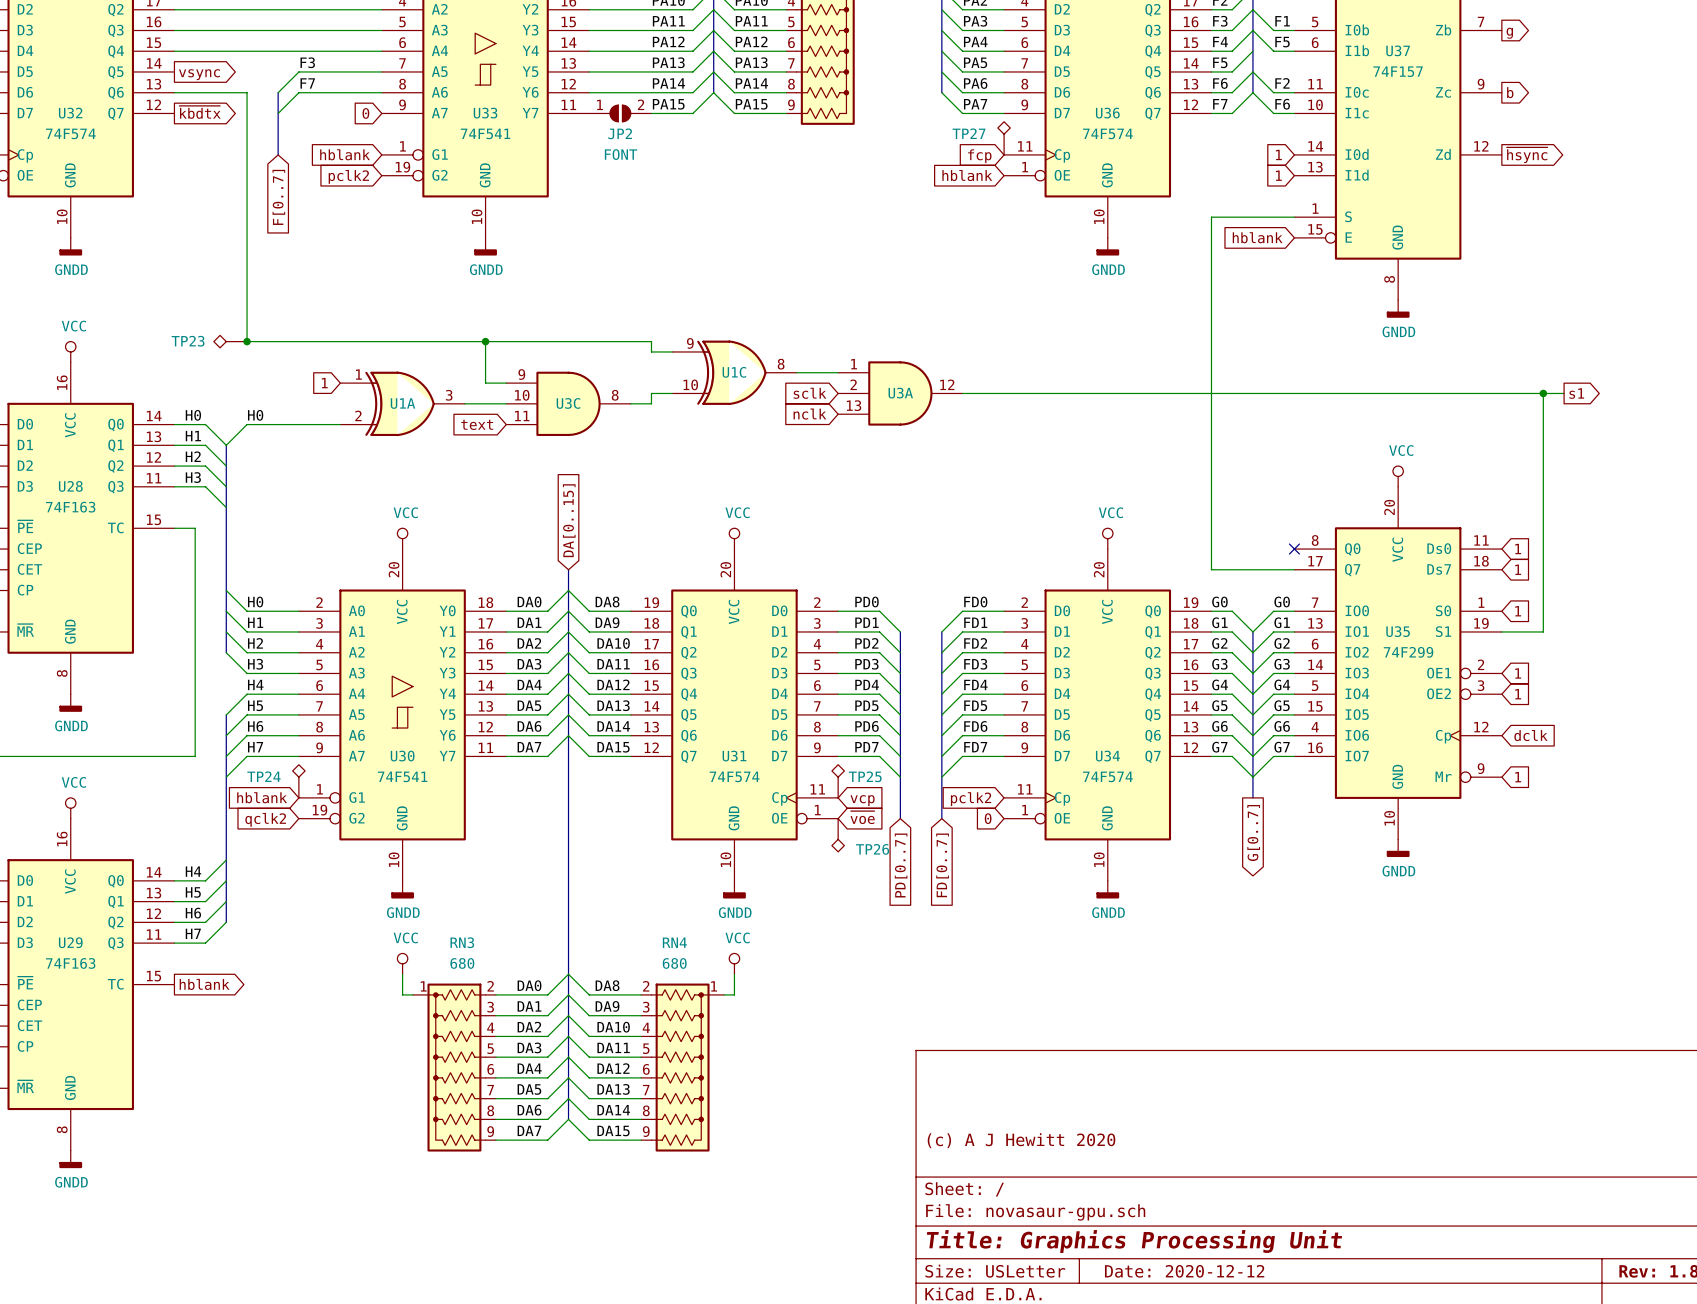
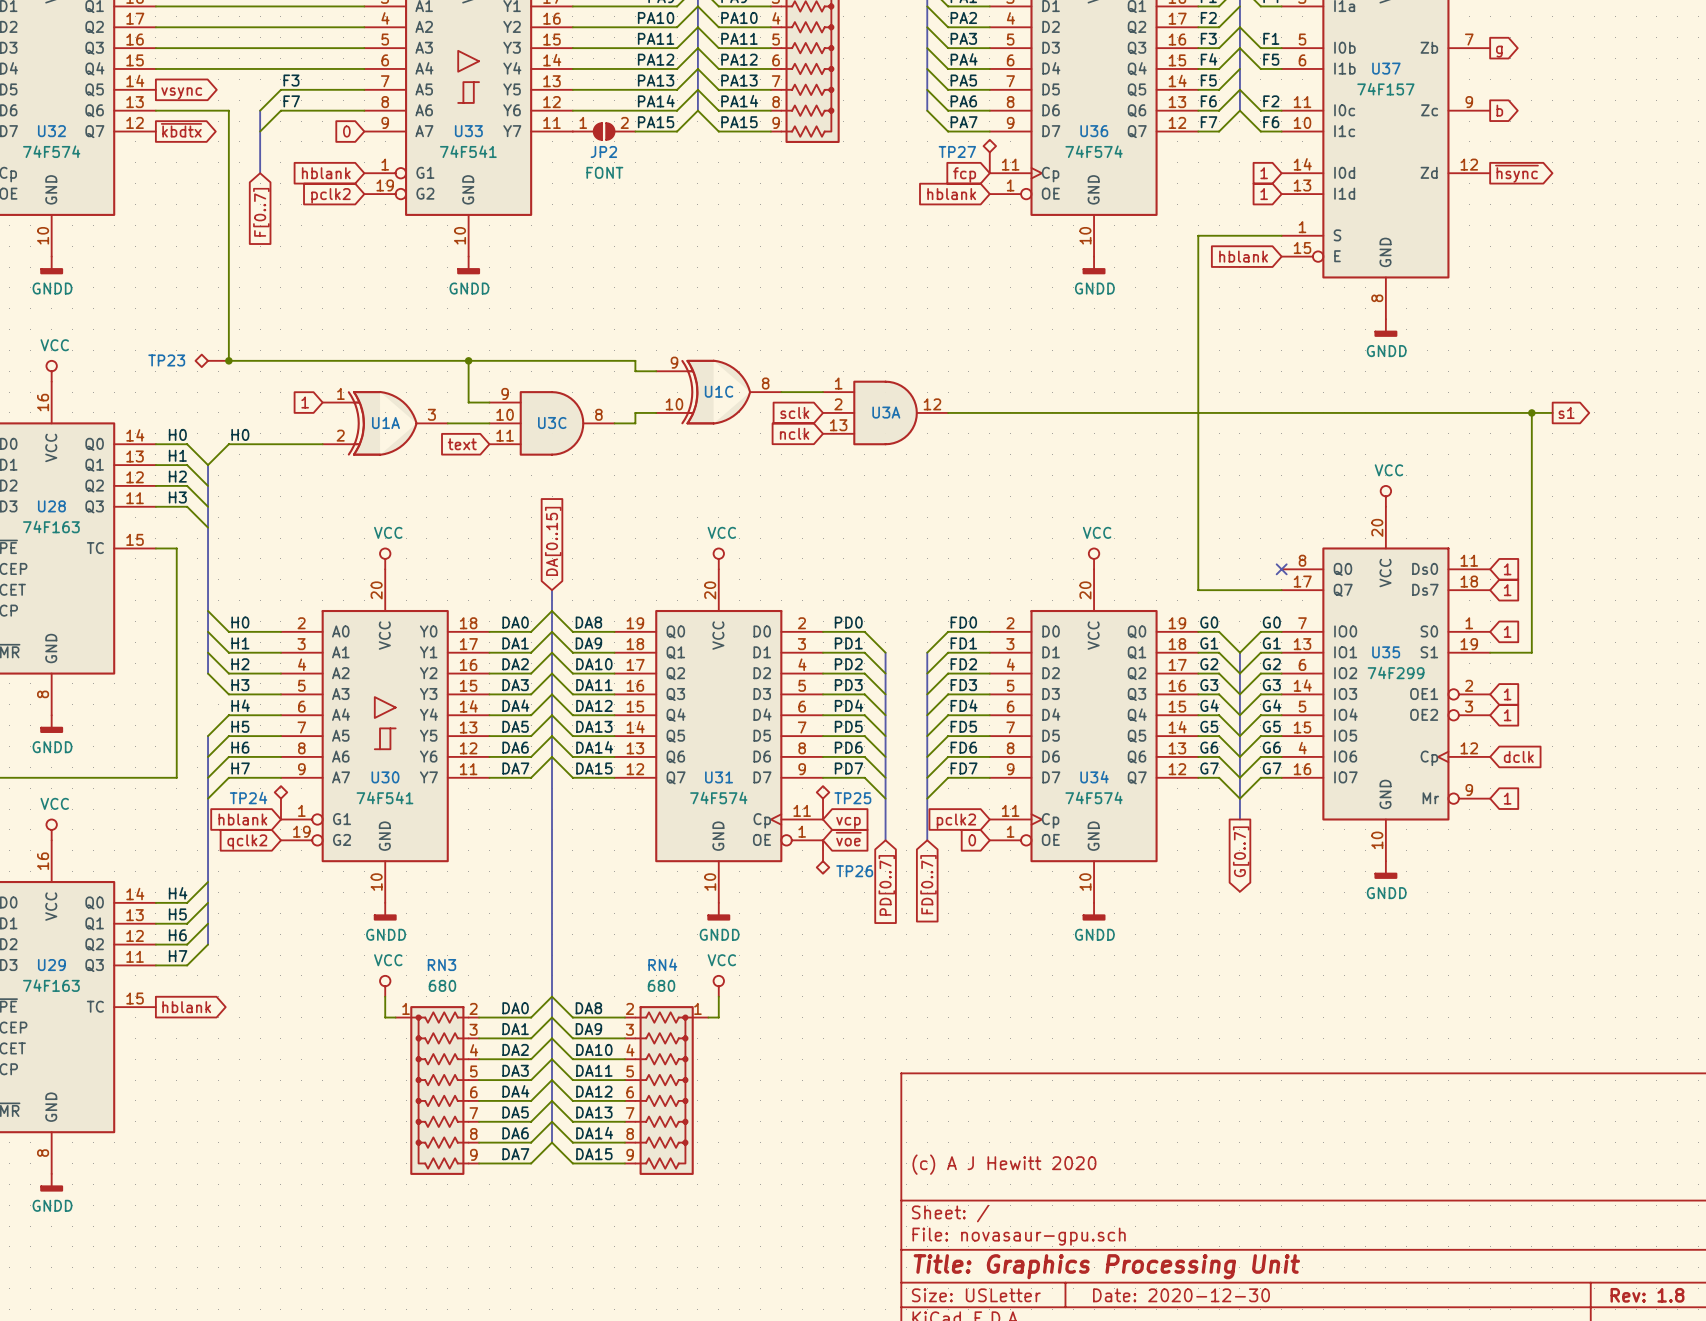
title block: Date: 2020-12-12 (1184, 1271) -> Date: 2020-12-30 (1181, 1295)

